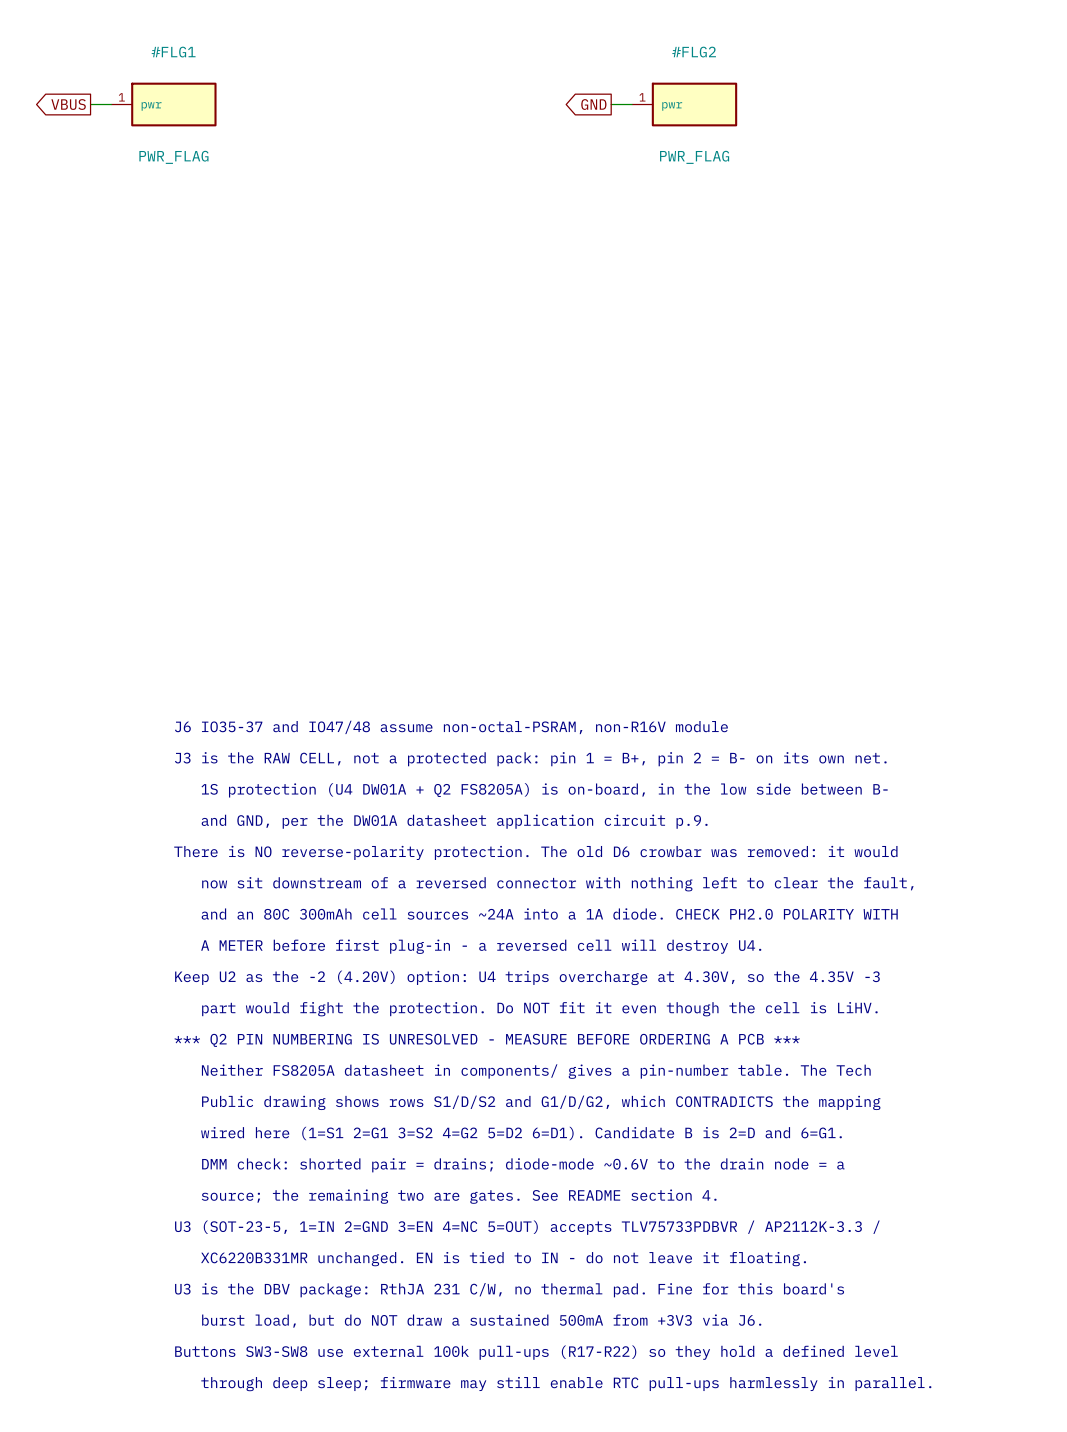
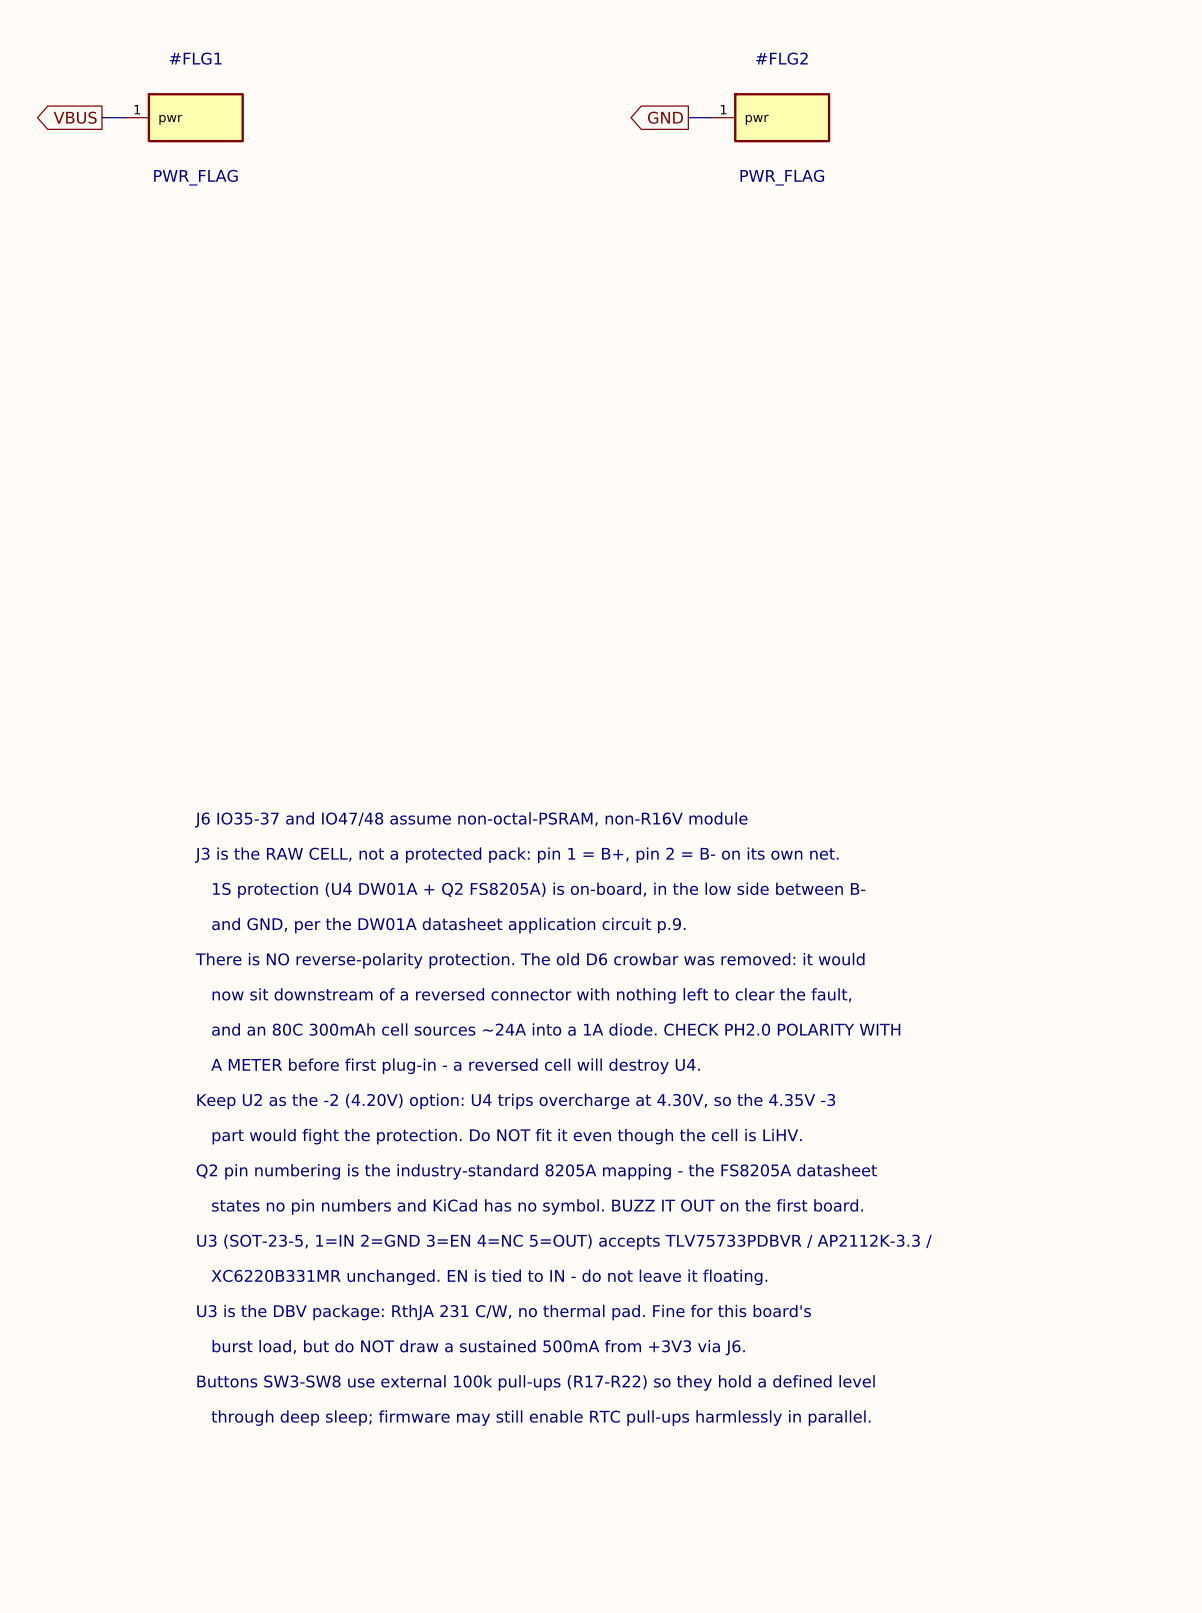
text: *** Q2 PIN NUMBERING IS UNRESOLVED - MEASURE BEFORE ORDERING A PCB *** (487, 1040) -> Q2 pin numbering is the industry-standard 8205A mapping - the FS8205A datasheet (536, 1171)
text: Neither FS8205A datasheet in components/ gives a pin-number table. The Tech (536, 1071) -> states no pin numbers and KiCad has no symbol. BUZZ IT OUT on the first board. (537, 1207)
text: Public drawing shows rows S1/D/S2 and G1/D/G2, which CONTRADICTS the mapping (541, 1102) -> U3 (SOT-23-5, 1=IN 2=GND 3=EN 4=NC 5=OUT) accepts TLV75733PDBVR / AP2112K-3.3 / (564, 1242)
text: wired here (1=S1 2=G1 3=S2 4=G2 5=D2 6=D1). Candidate B is 2=D and 6=G1. (521, 1133) -> XC6220B331MR unchanged. EN is tied to IN - do not leave it floating. (489, 1277)
text: DMM check: shorted pair = drains; diode-mode ~0.6V to the drain node = a (523, 1165) -> U3 is the DBV package: RthJA 231 C/W, no thermal pad. Fine for this board's (504, 1312)
text: source; the remaining two are gates. See README section 4. (459, 1196) -> burst load, but do NOT draw a sustained 500mA from +3V3 via J6. (478, 1347)
text: U3 (SOT-23-5, 1=IN 2=GND 3=EN 4=NC 5=OUT) accepts TLV75733PDBVR / AP2112K-3.3 / (527, 1227) -> Buttons SW3-SW8 use external 100k pull-ups (R17-R22) so they hold a defined level (536, 1382)
text: XC6220B331MR unchanged. EN is tied to IN - do not leave it floating. (503, 1259) -> through deep sleep; firmware may still enable RTC pull-ups harmlessly in parallel. (541, 1418)
text: U3 is the DBV package: RthJA 231 C/W, no thermal pad. Fine for this board's (509, 1290) -> none
text: burst load, but do NOT draw a sustained 500mA from +3V3 via J6. (481, 1321) -> none
text: Buttons SW3-SW8 use external 100k pull-ups (R17-R22) so they hold a defined level (536, 1352) -> none
text: through deep sleep; firmware may still enable RTC pull-ups harmlessly in parallel. (566, 1384) -> none

